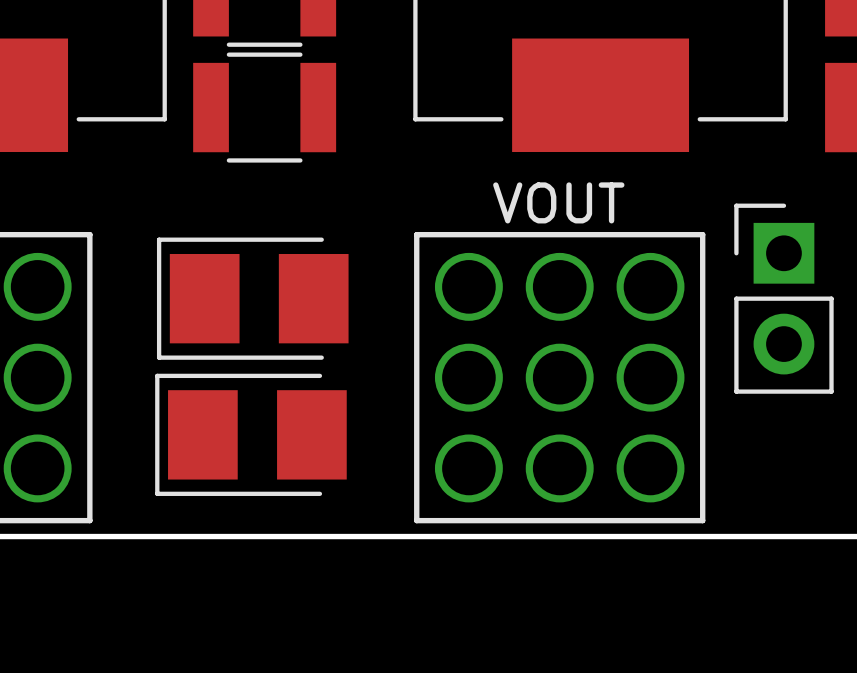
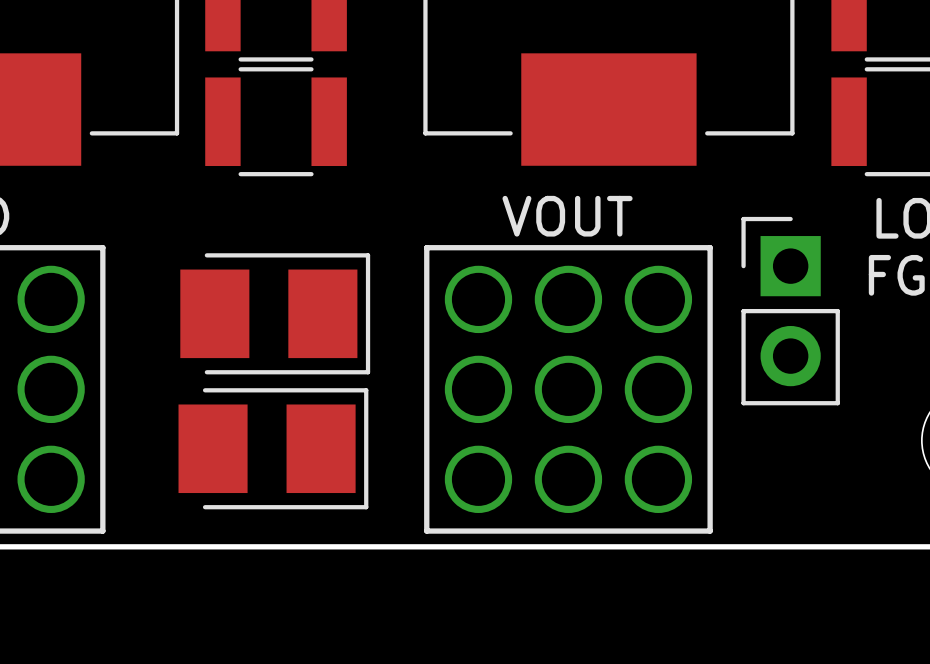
part rotation: 0° (252, 298) -> 180° (275, 313)
part rotation: 0° (250, 434) -> 180° (273, 448)

